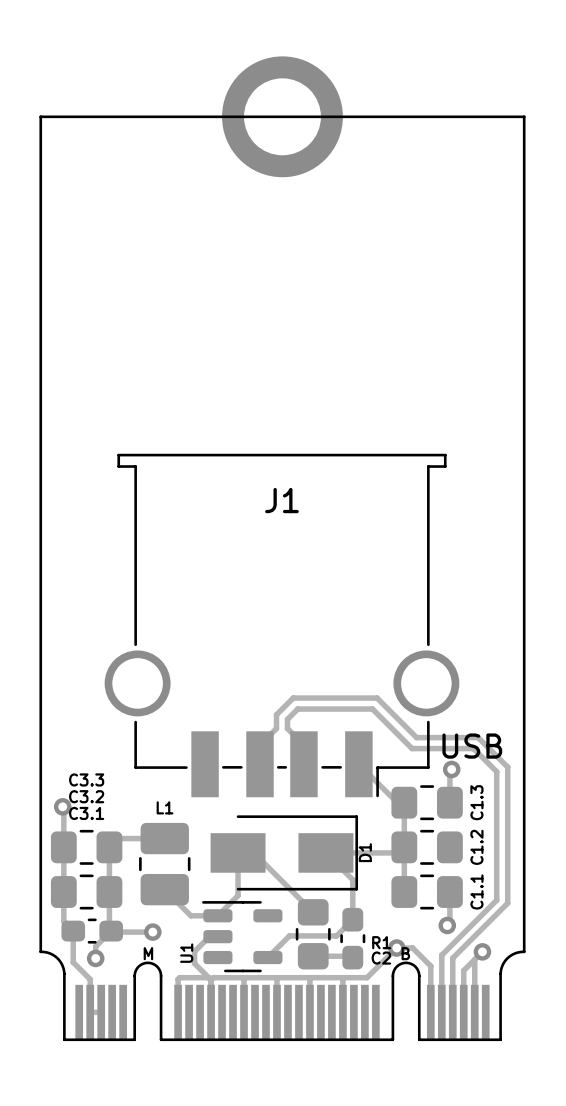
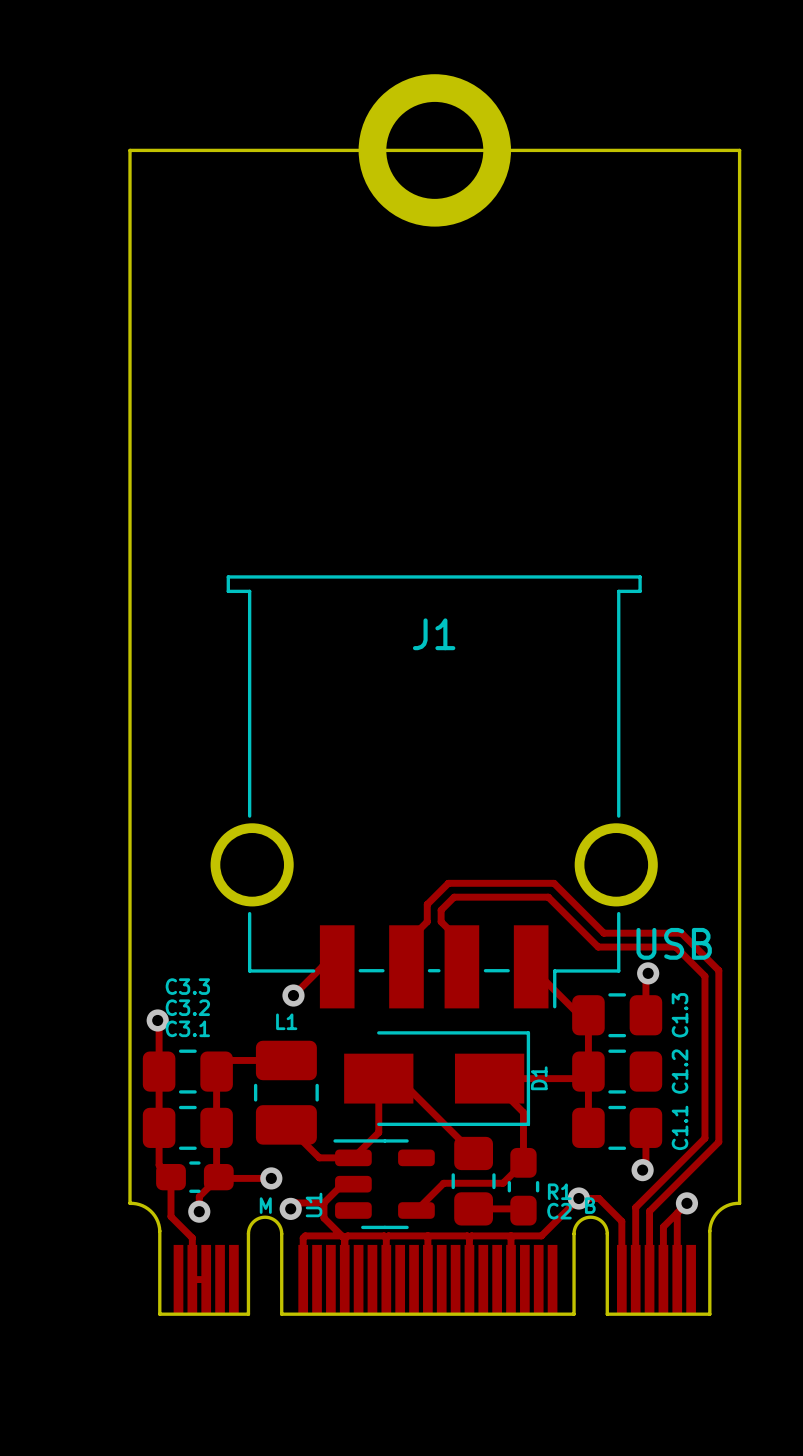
track: none -> (337, 966) (322, 966) (293, 995)
via: none -> (293, 995)
track: none -> (323, 1202) (296, 1202) (290, 1208)
via: none -> (290, 1208)

